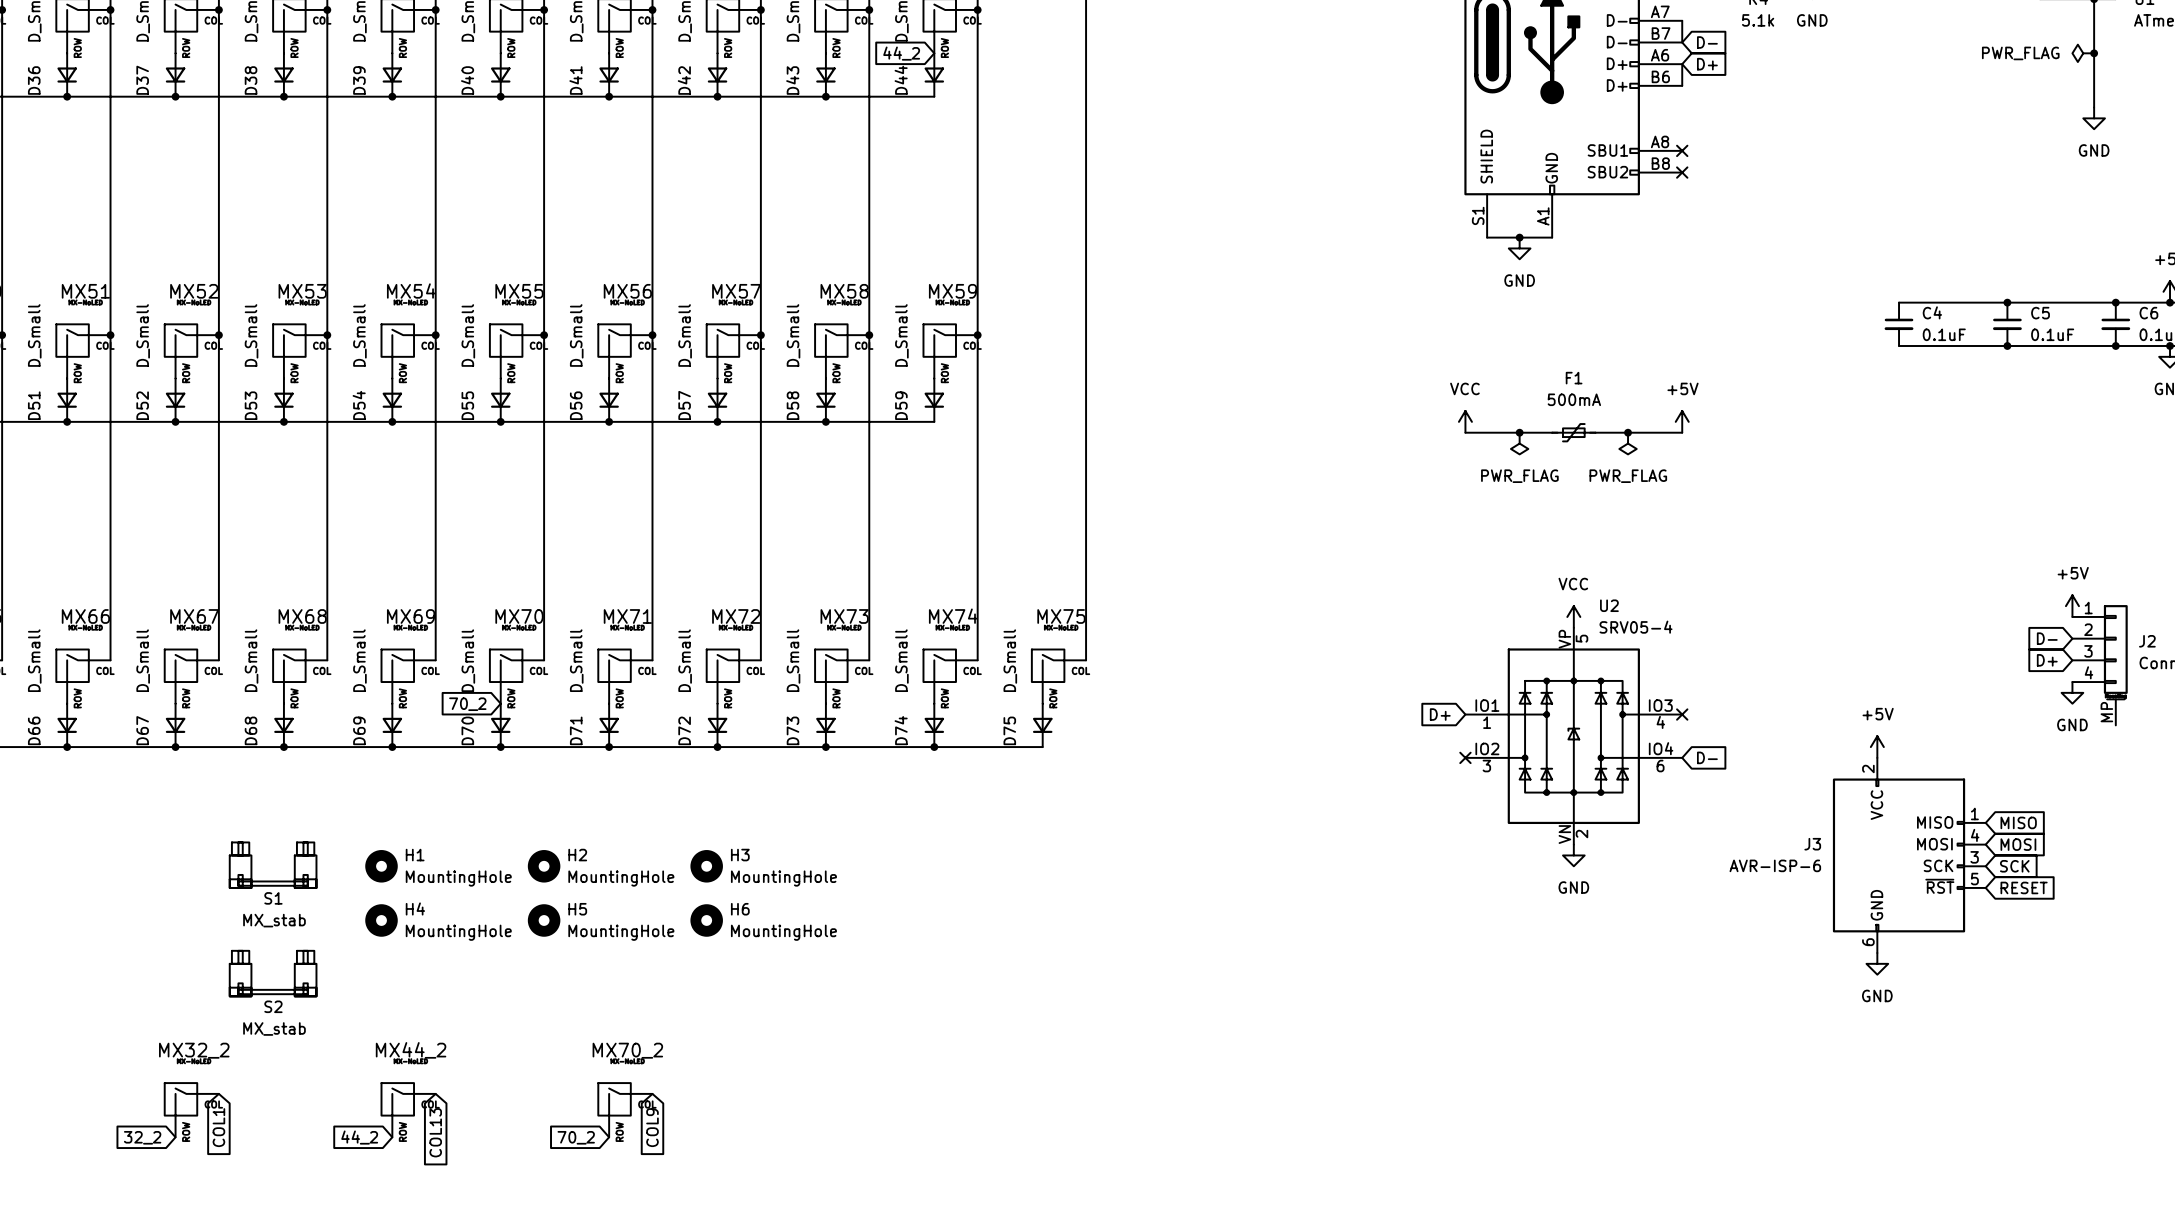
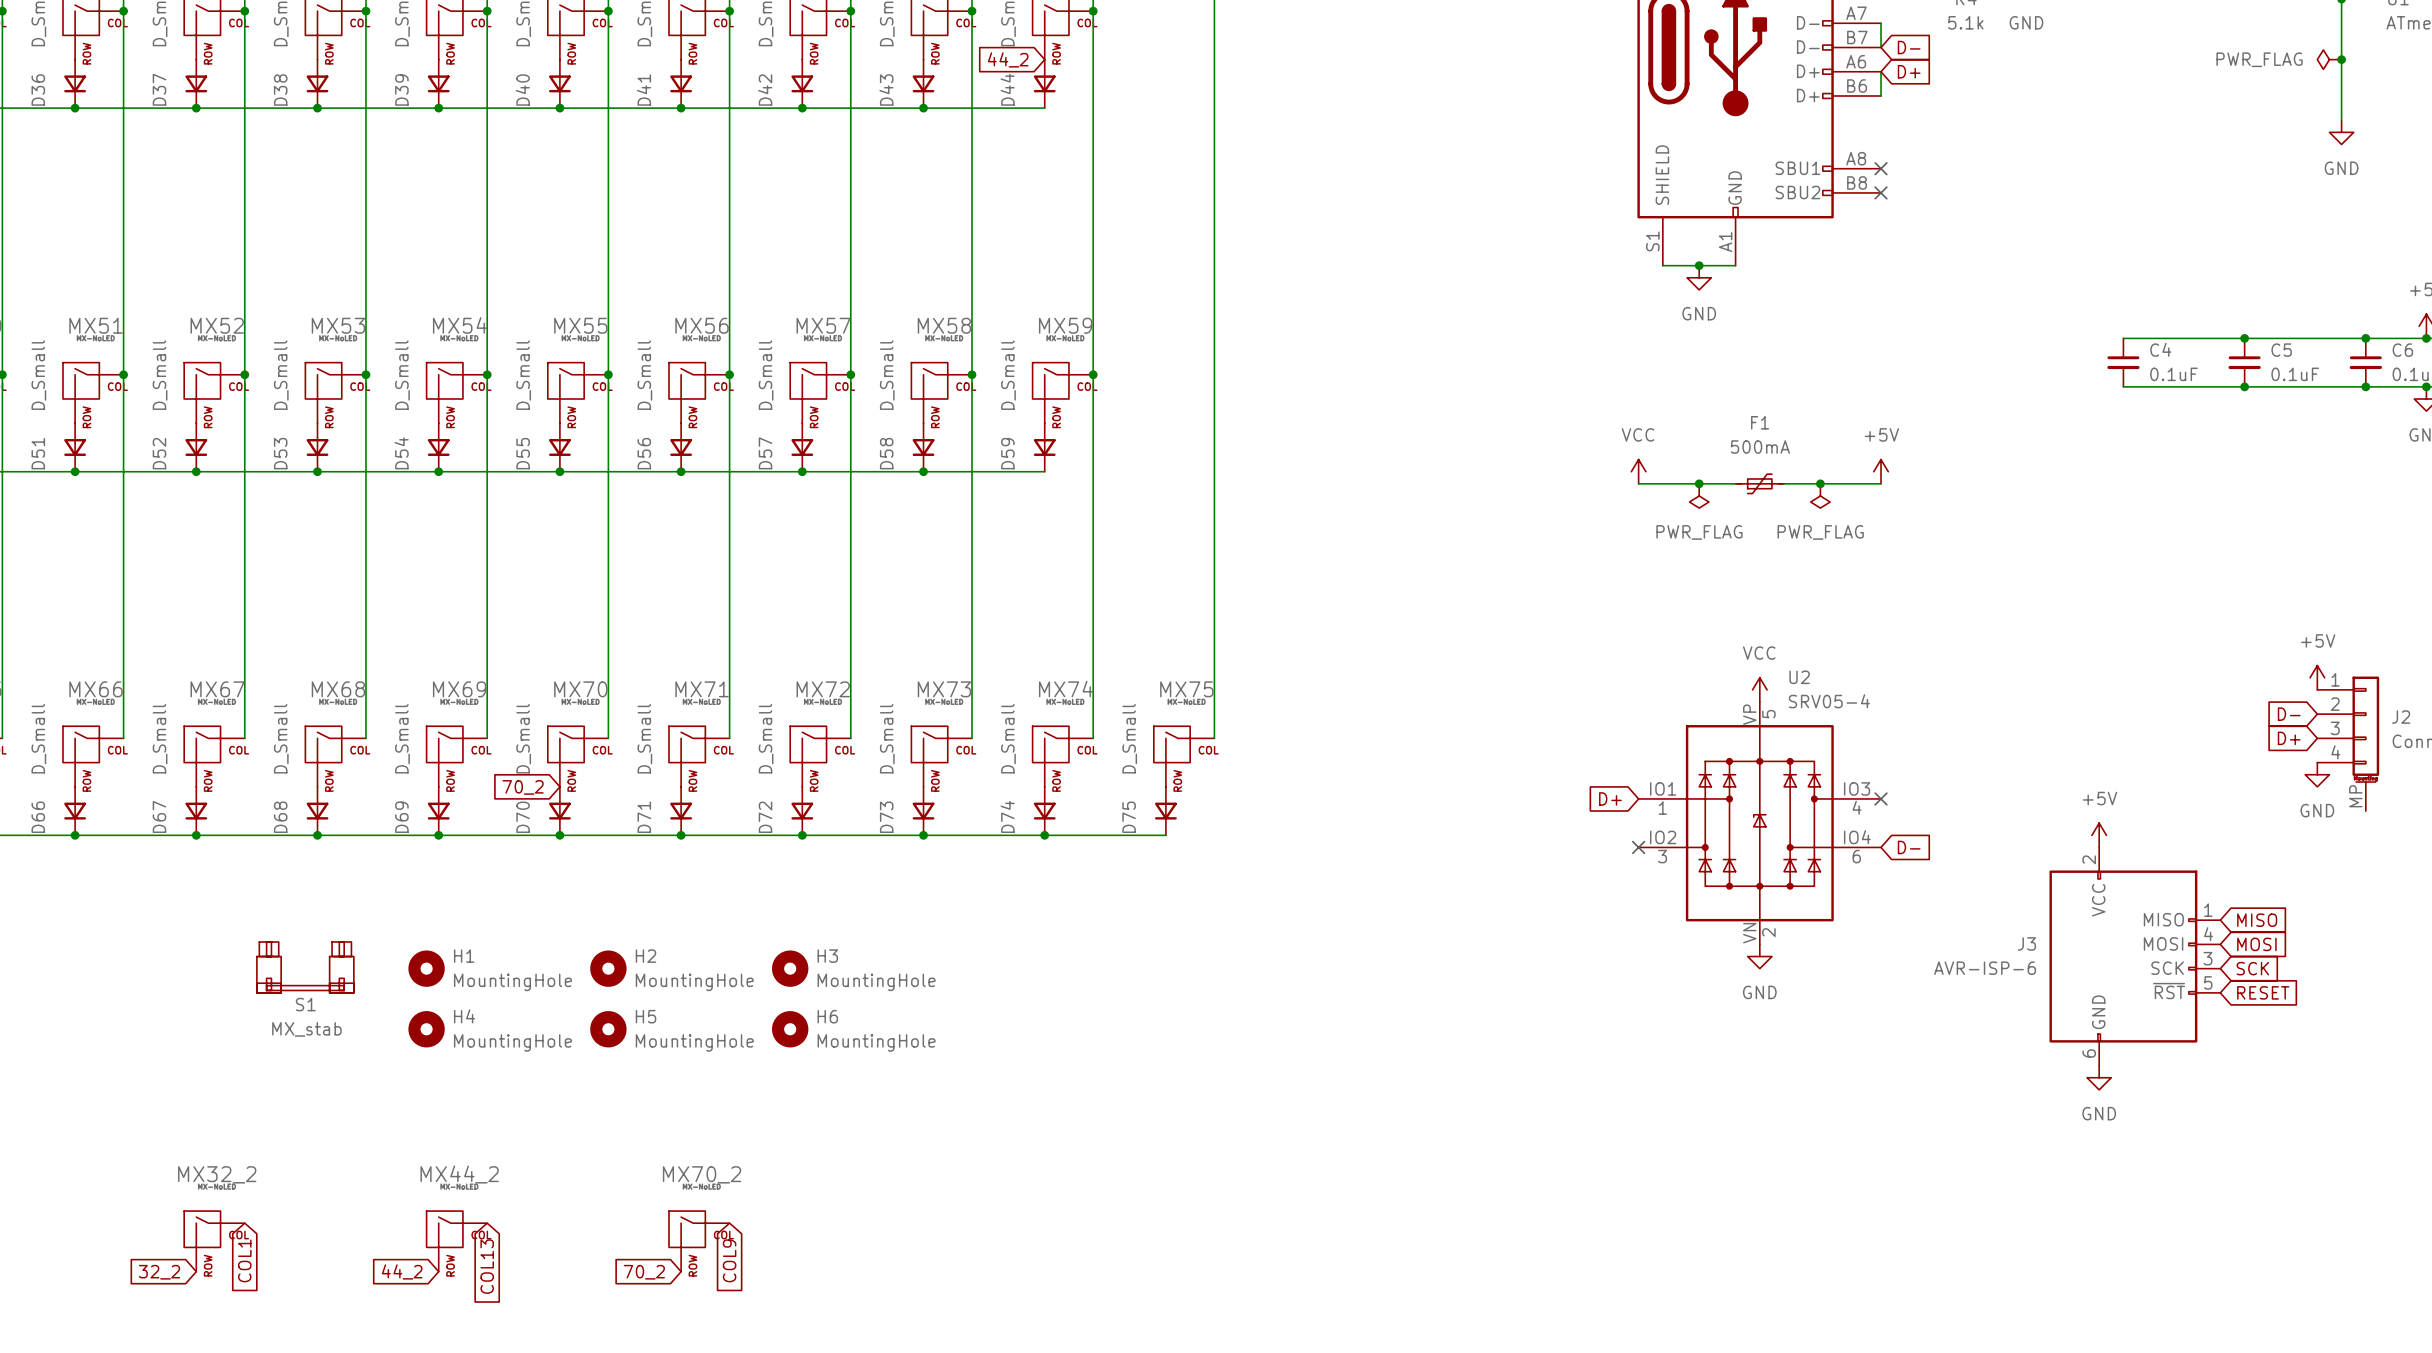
S2: MX_stab (273, 973) -> none

